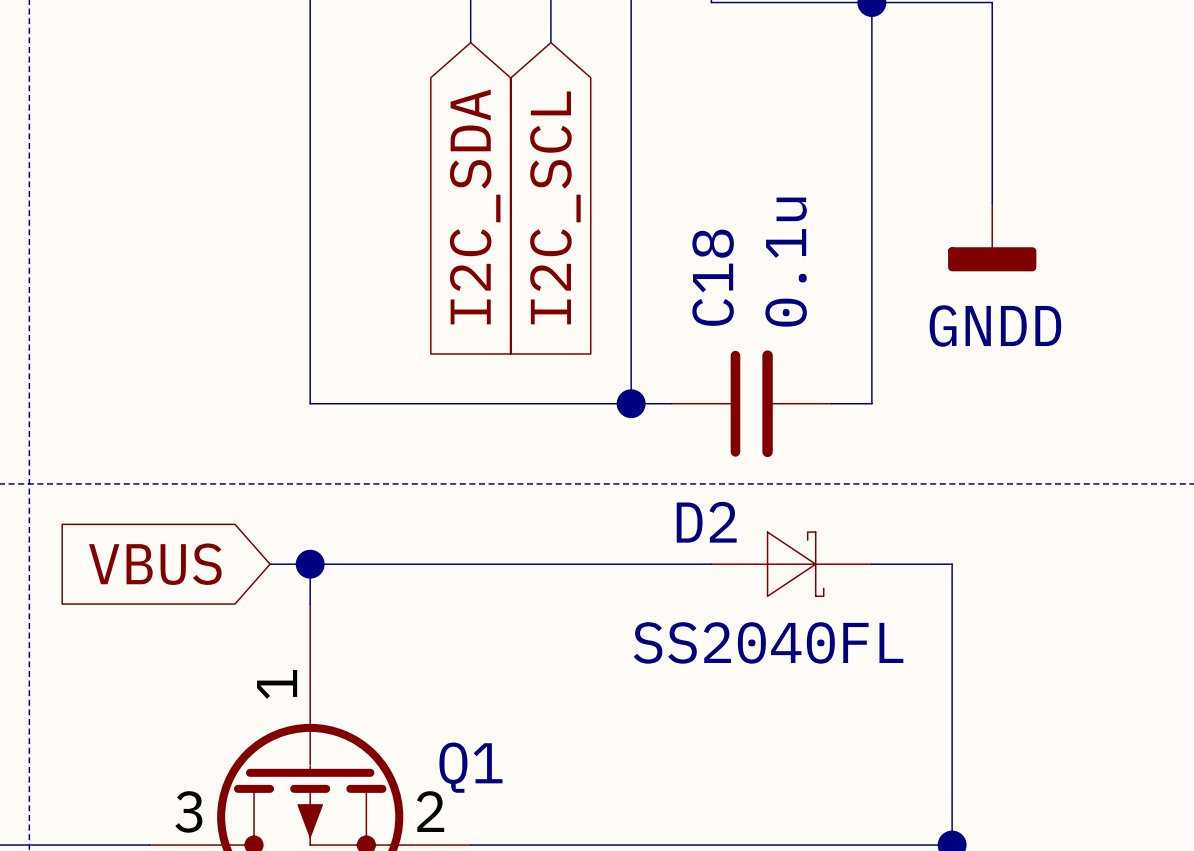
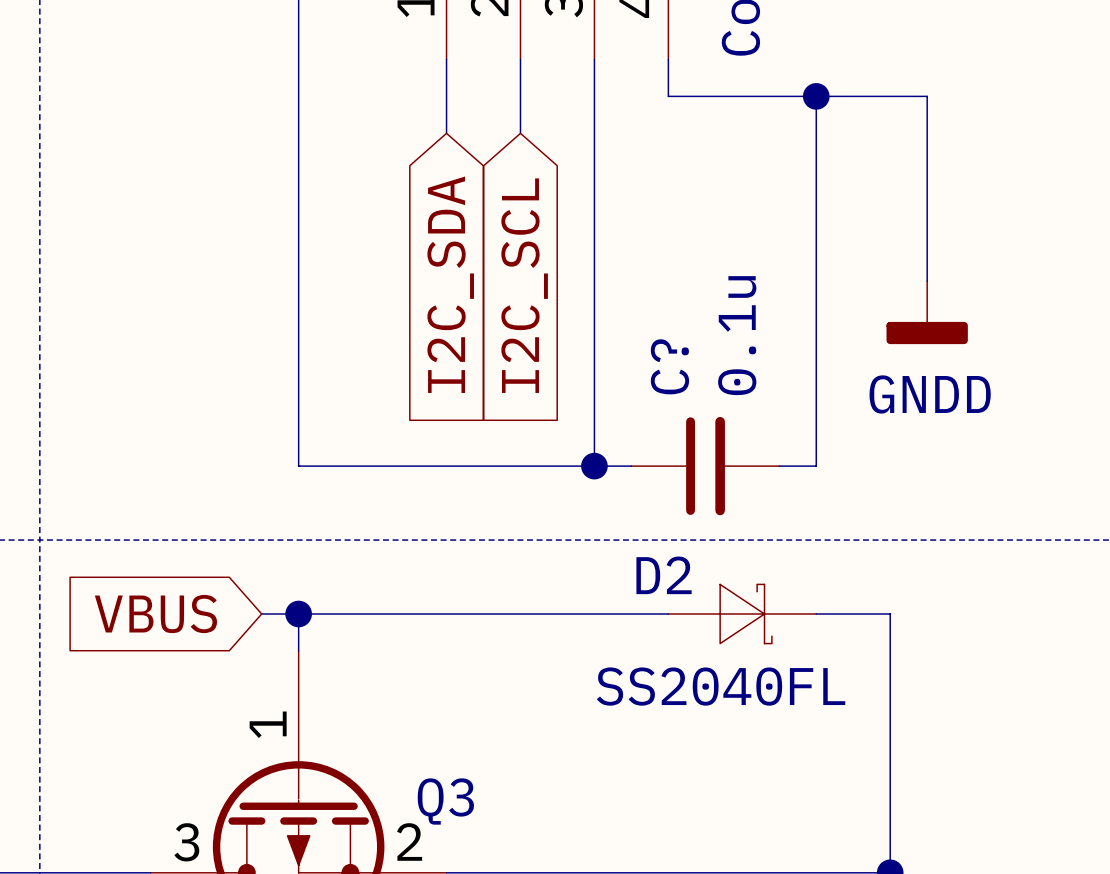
C18 name: C18 (713, 277) -> C? (669, 366)
Q1 name: Q1 (470, 767) -> Q3 (445, 801)

